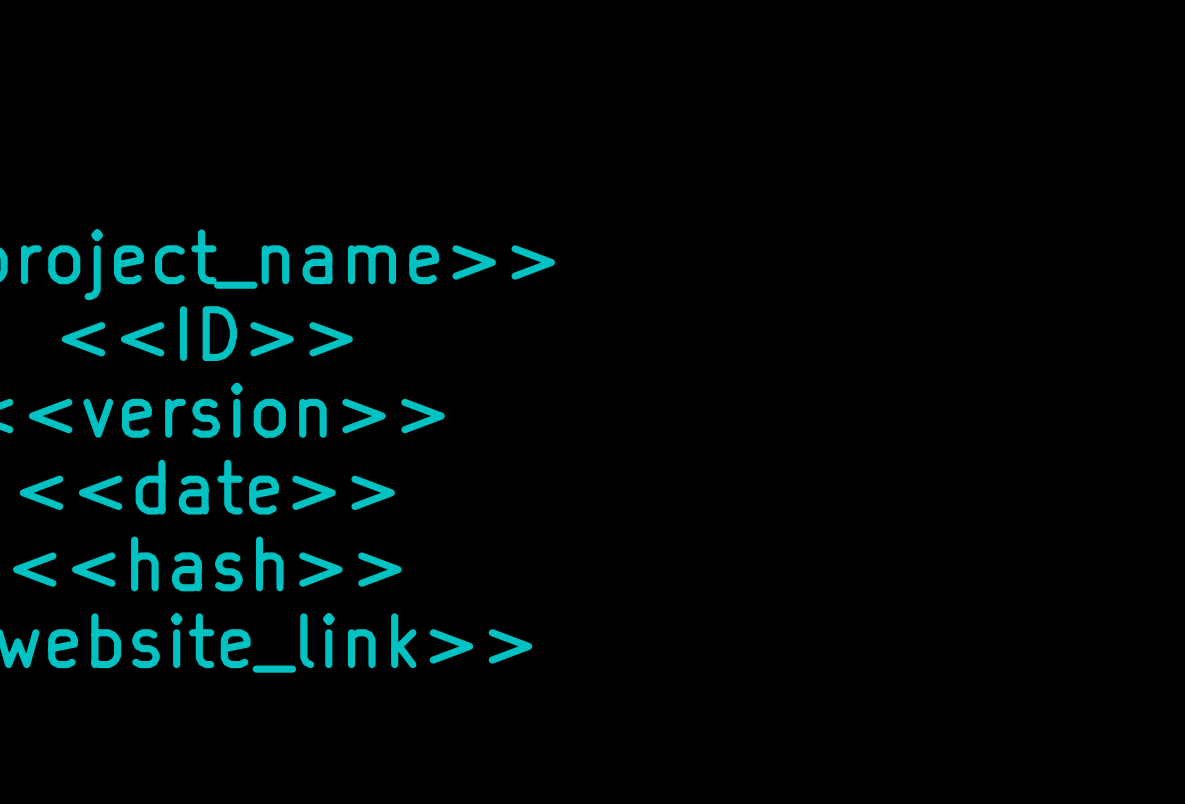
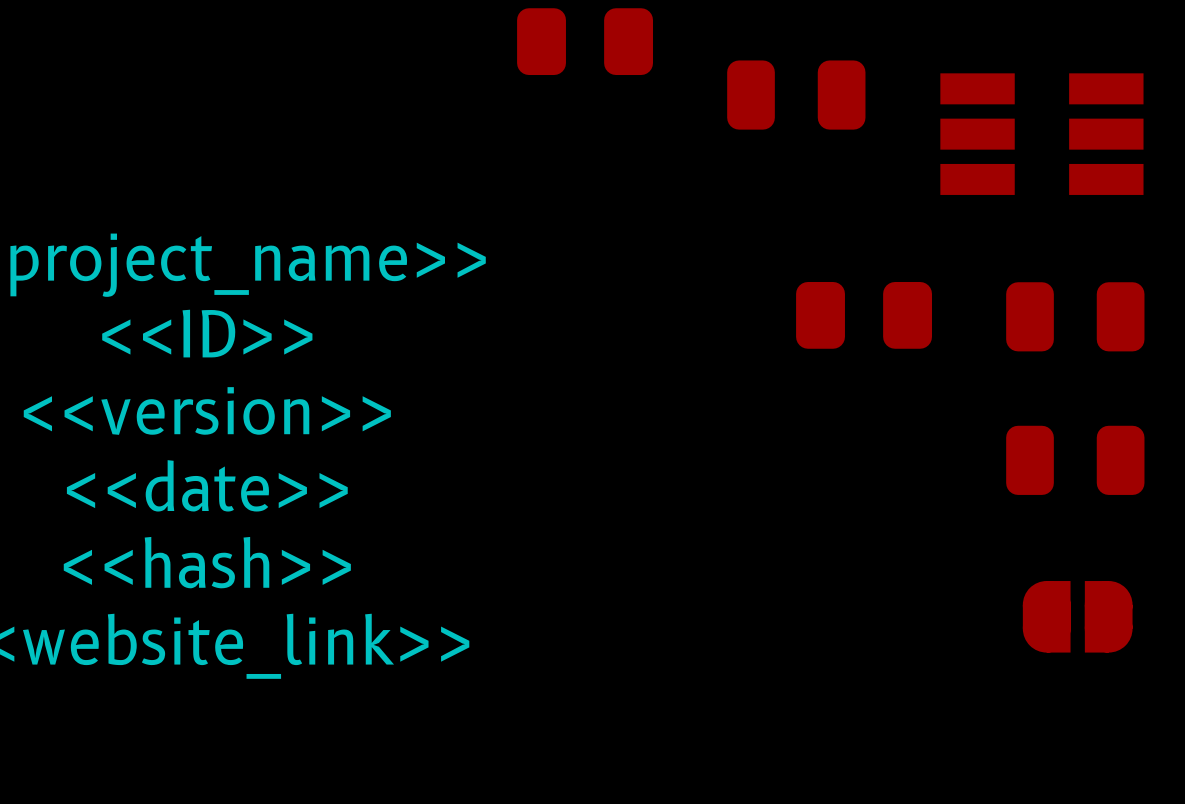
part: none -> (585, 41)
part: none -> (796, 95)
part: none -> (1041, 134)
part: none -> (864, 315)
part: none -> (1075, 316)
part: none -> (1075, 460)
part: none -> (1077, 616)

